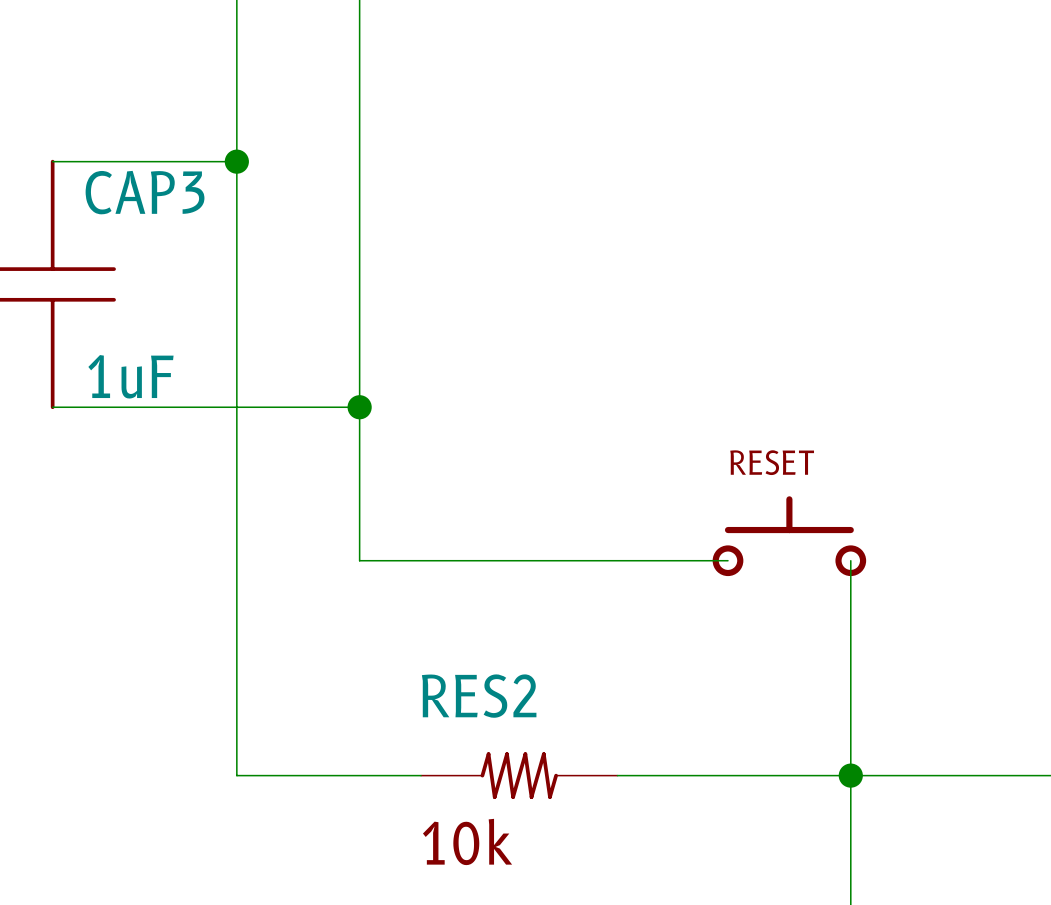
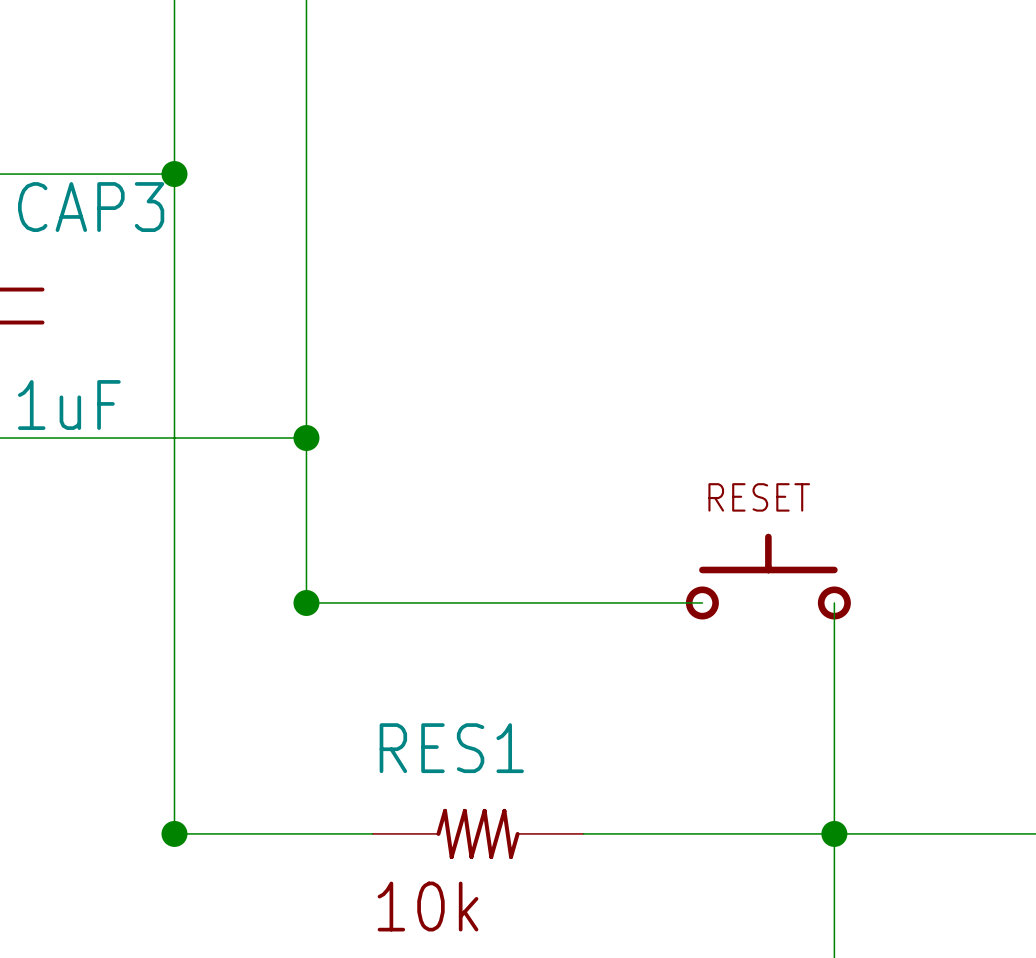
junction: none -> (306, 602)
RES2 name: RES2 (479, 696) -> RES1 (451, 748)
junction: none -> (174, 833)

